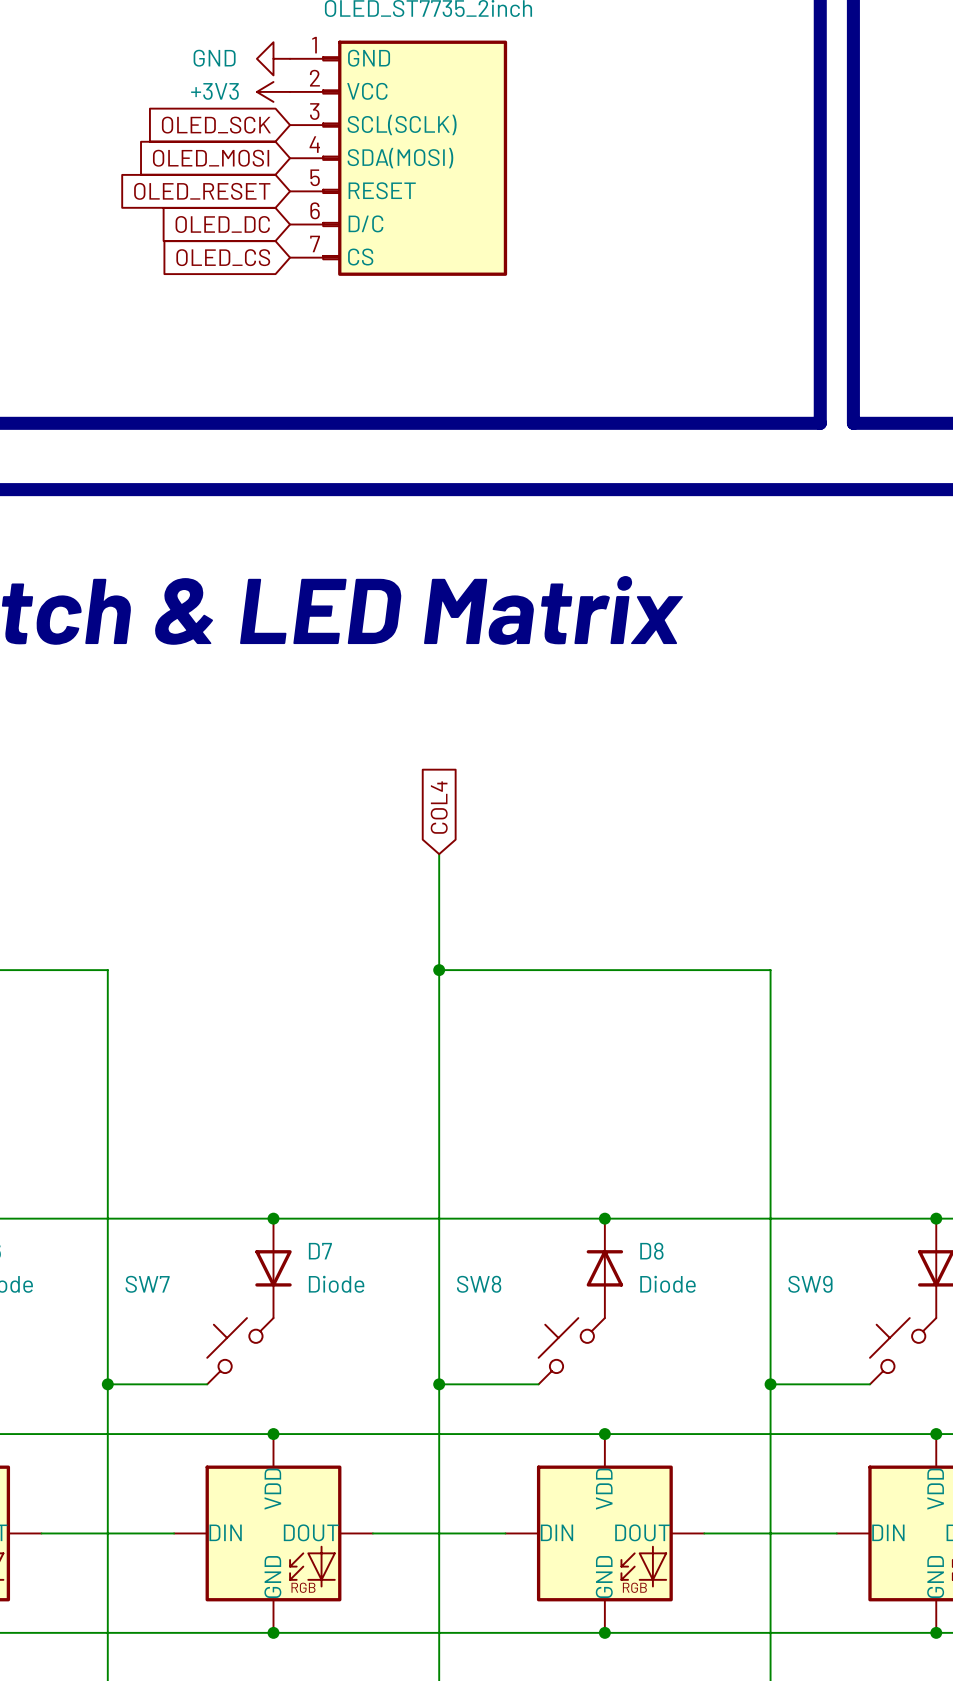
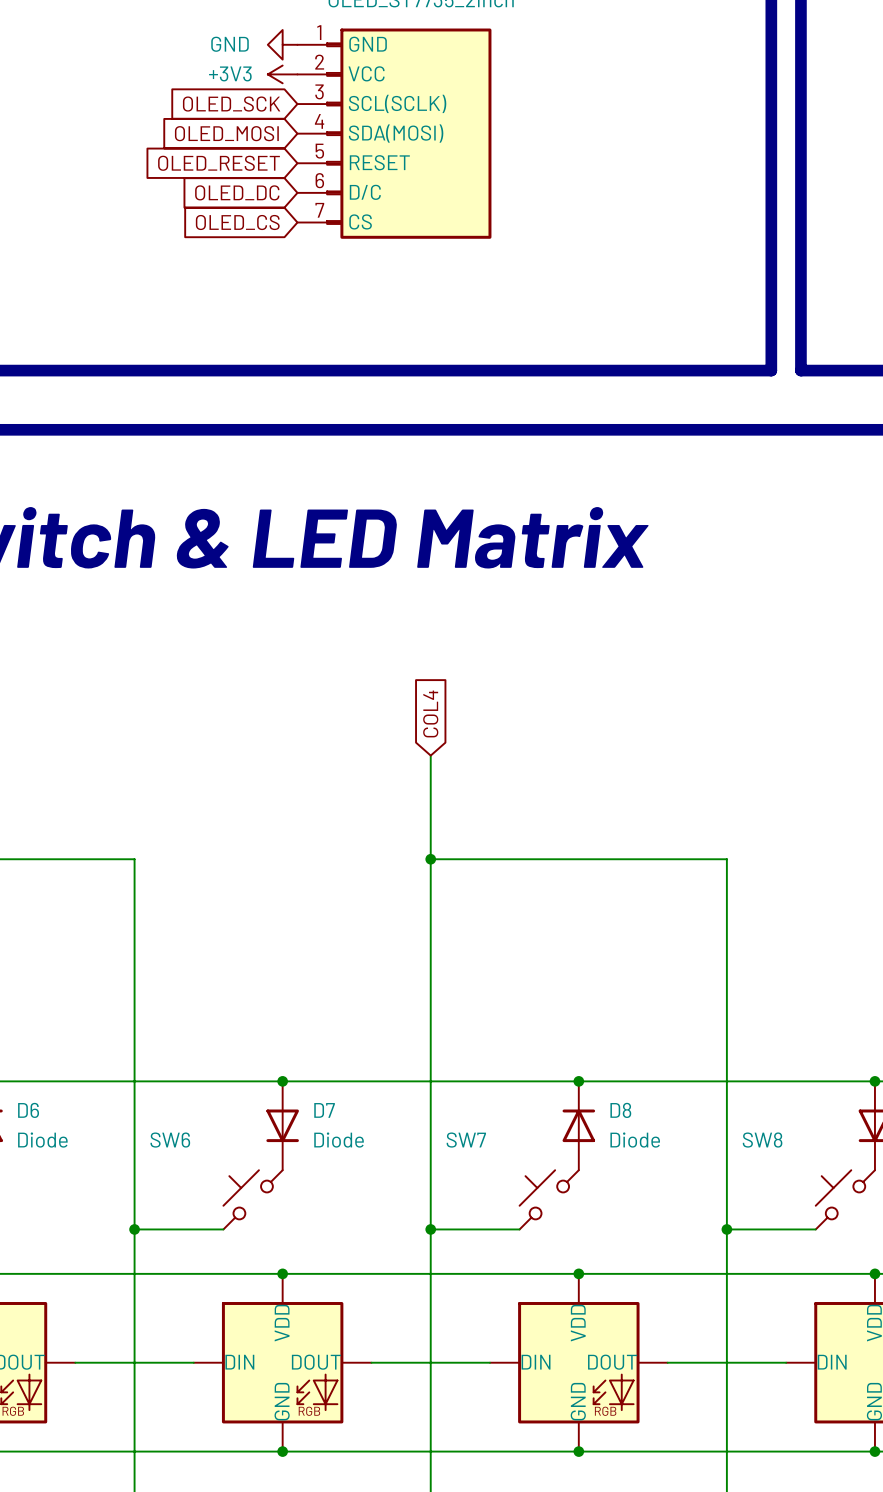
SW7 name: SW7 (147, 1284) -> SW6 (170, 1140)
SW8 name: SW8 (479, 1284) -> SW7 (466, 1140)
SW9 name: SW9 (810, 1284) -> SW8 (762, 1140)

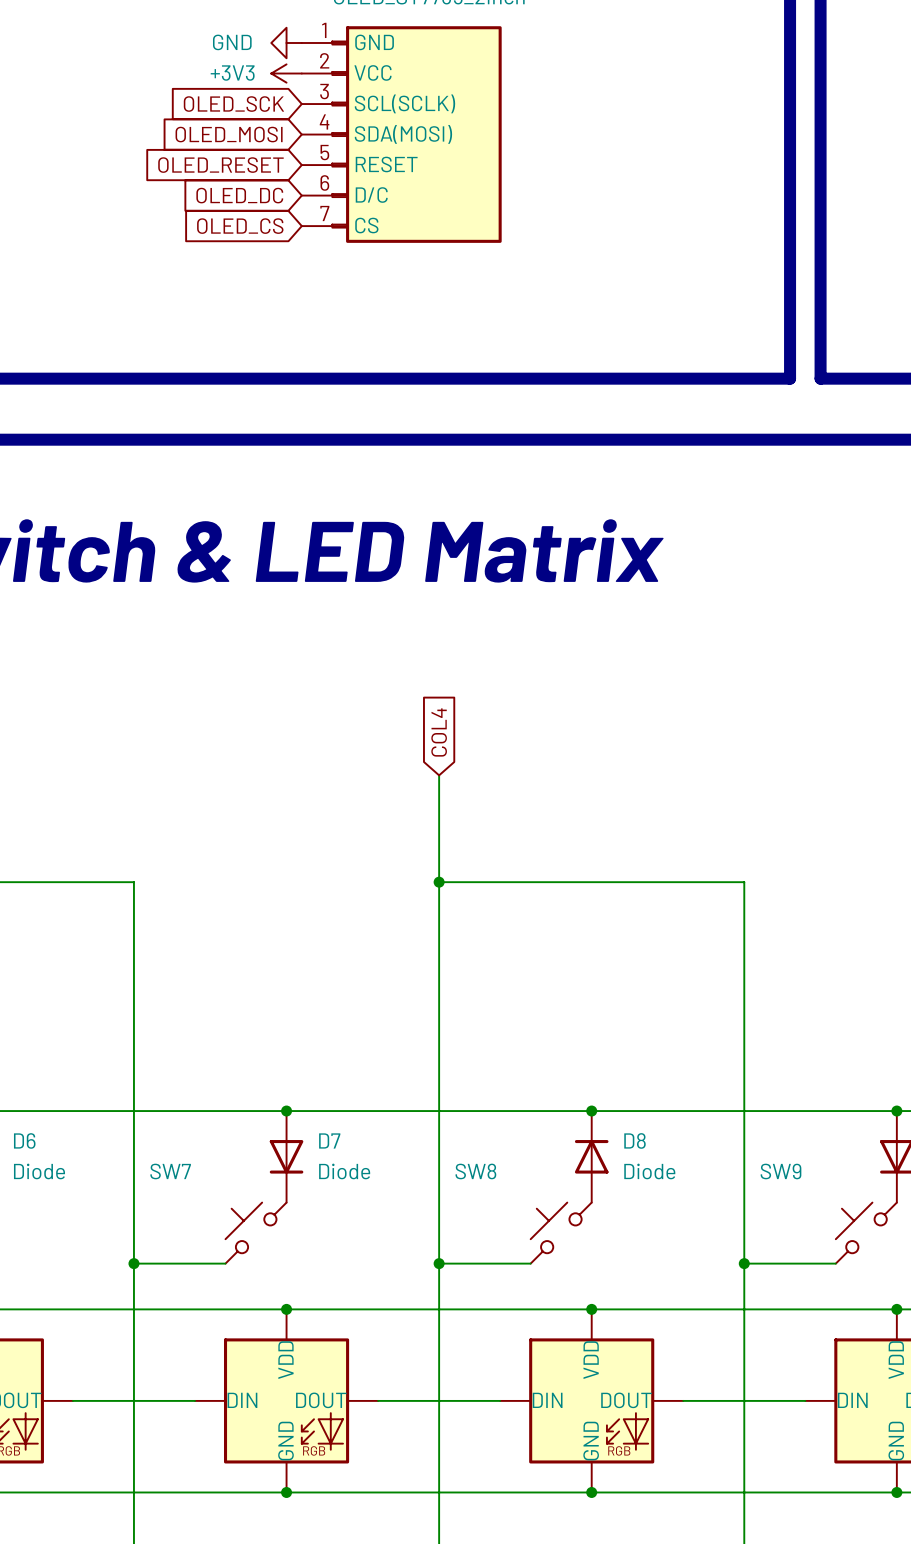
SW6 name: SW6 (170, 1140) -> SW7 (170, 1171)
SW7 name: SW7 (466, 1140) -> SW8 (475, 1171)
SW8 name: SW8 (762, 1140) -> SW9 (781, 1171)

